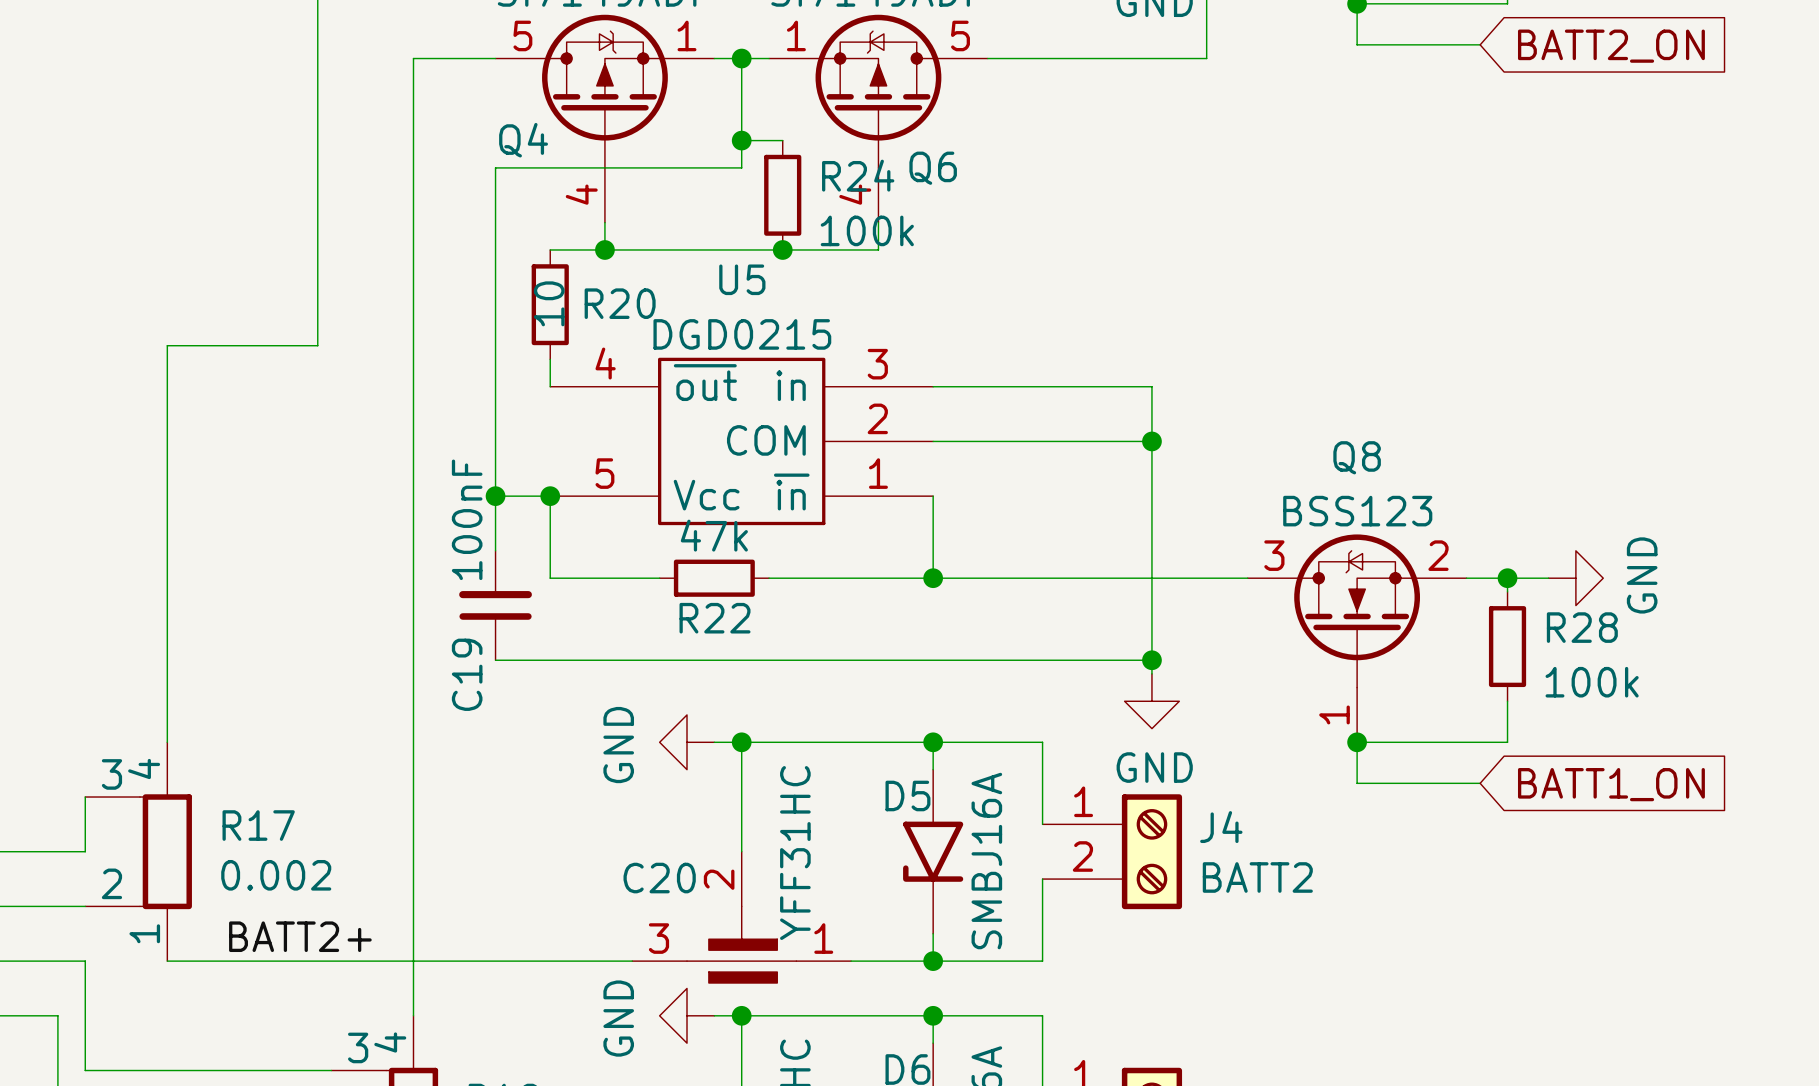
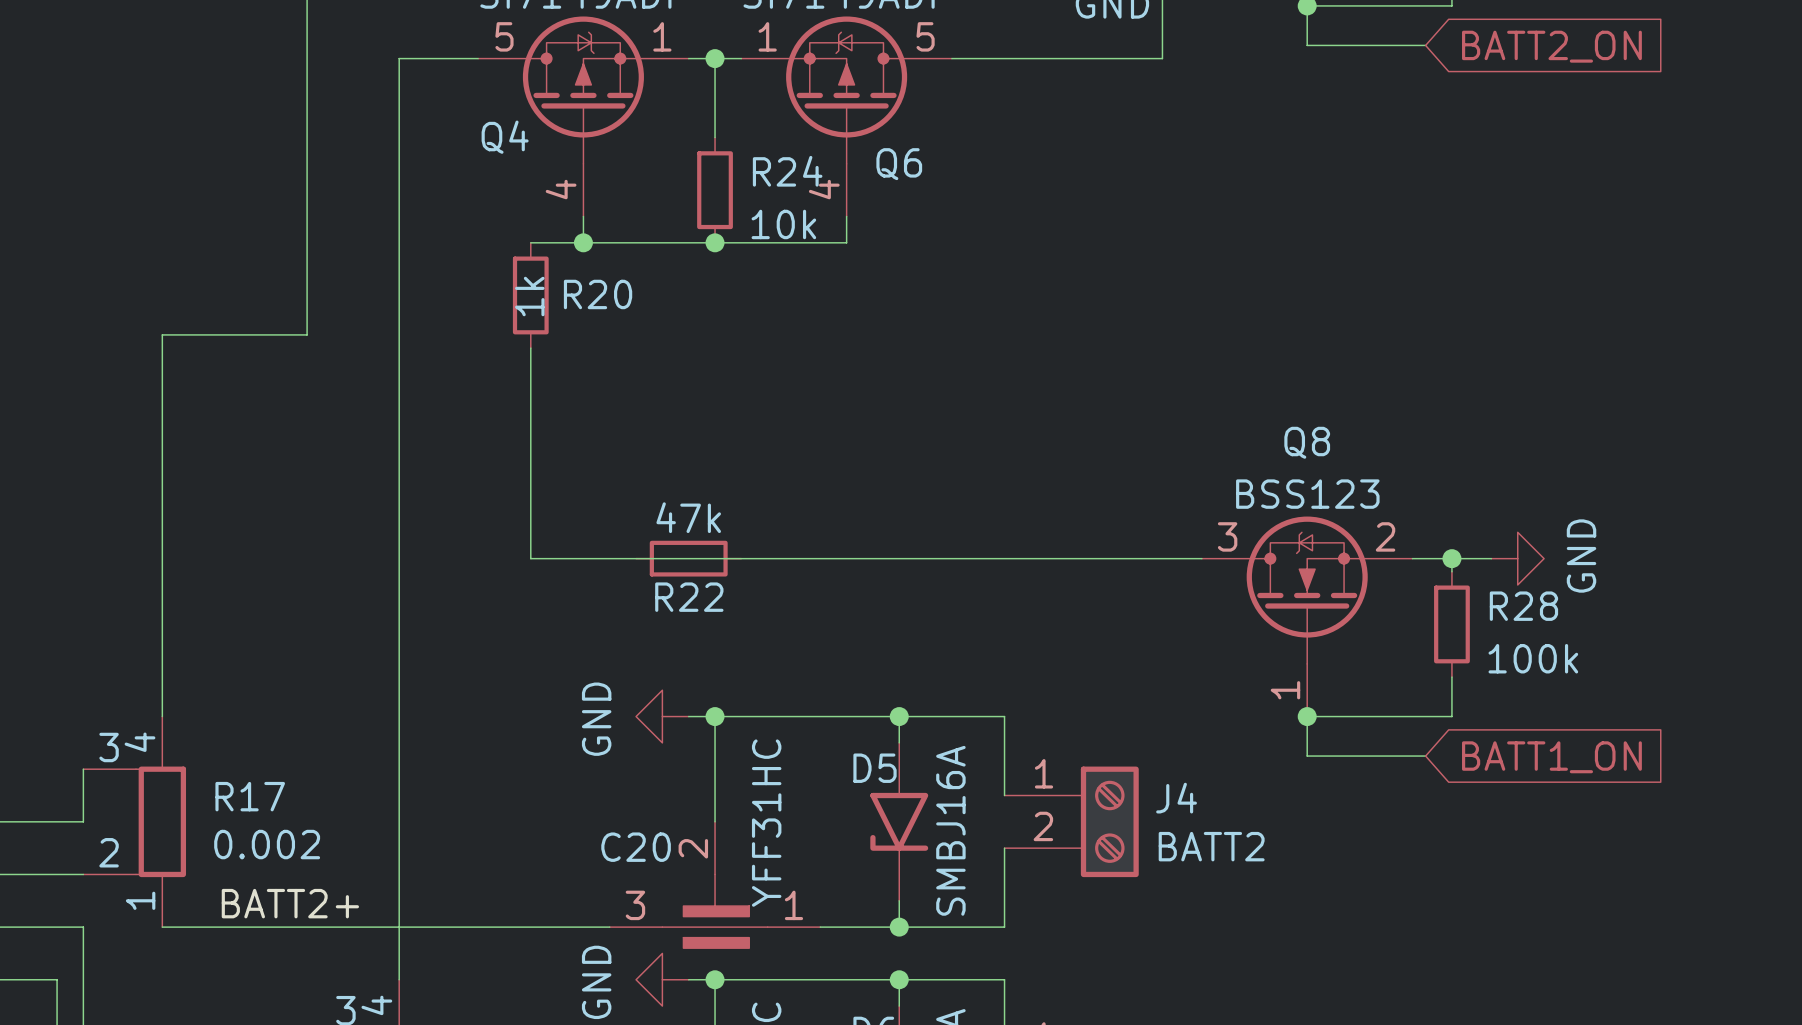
junction: (741, 140) -> none
wire: (782, 140) (741, 140) (741, 167) (495, 167) (495, 550) -> none
R24 position: (782, 195) -> (715, 190)
R24 value: 100k (867, 230) -> 10k (783, 224)
junction position: (782, 249) -> (715, 242)
R20 value: 10 (549, 303) -> 1k (529, 296)
wire: (933, 386) (1151, 386) (1151, 673) -> none
U5: DGD0215 (741, 441) -> none
wire: (933, 441) (1151, 441) -> none
junction: (1151, 441) -> none
wire: (495, 496) (550, 496) -> (530, 374) (530, 479)
junction: (495, 496) -> none
junction: (550, 496) -> none
wire: (933, 496) (933, 578) -> none
wire: none -> (636, 558) (741, 558)
junction: (933, 578) -> none
C19: 100nF (495, 605) -> none
wire: (495, 660) (1151, 660) -> none
junction: (1151, 660) -> none
power symbol: GND (1151, 701) -> none

